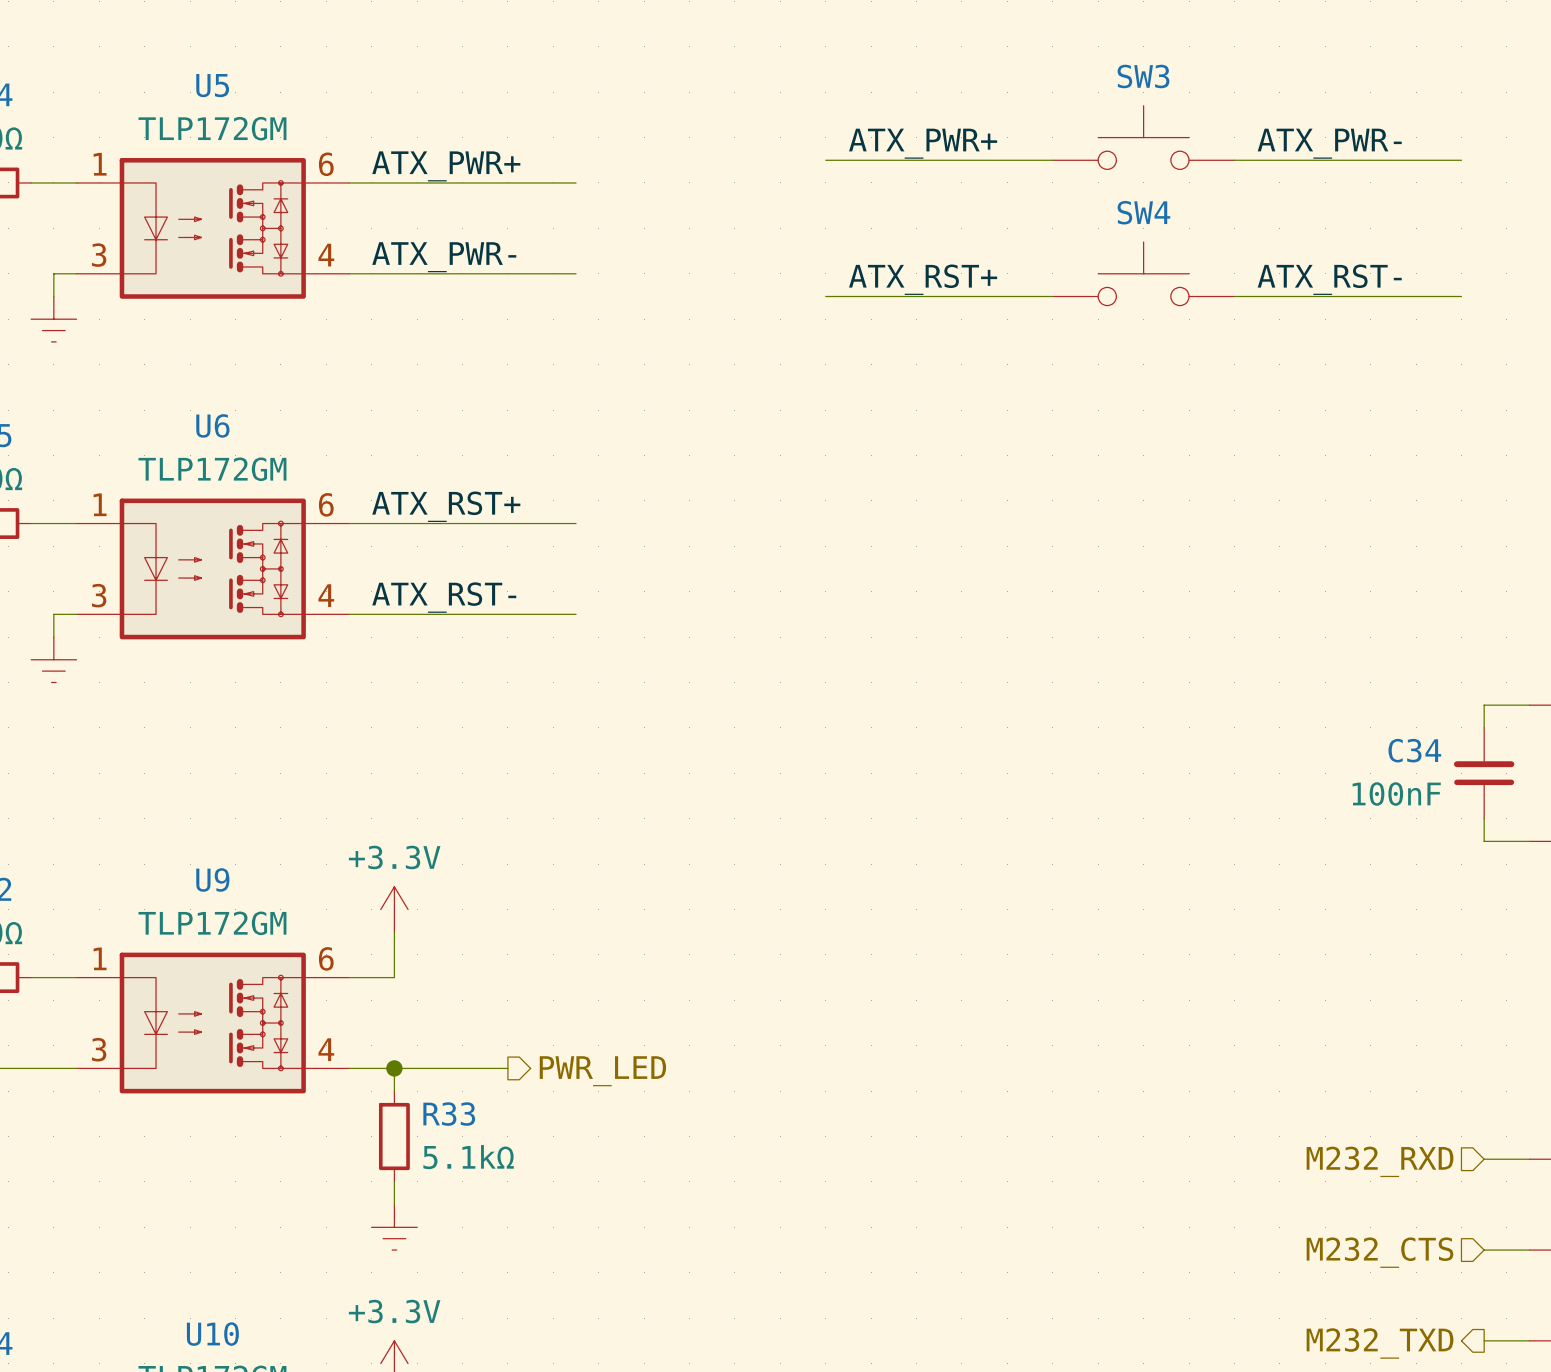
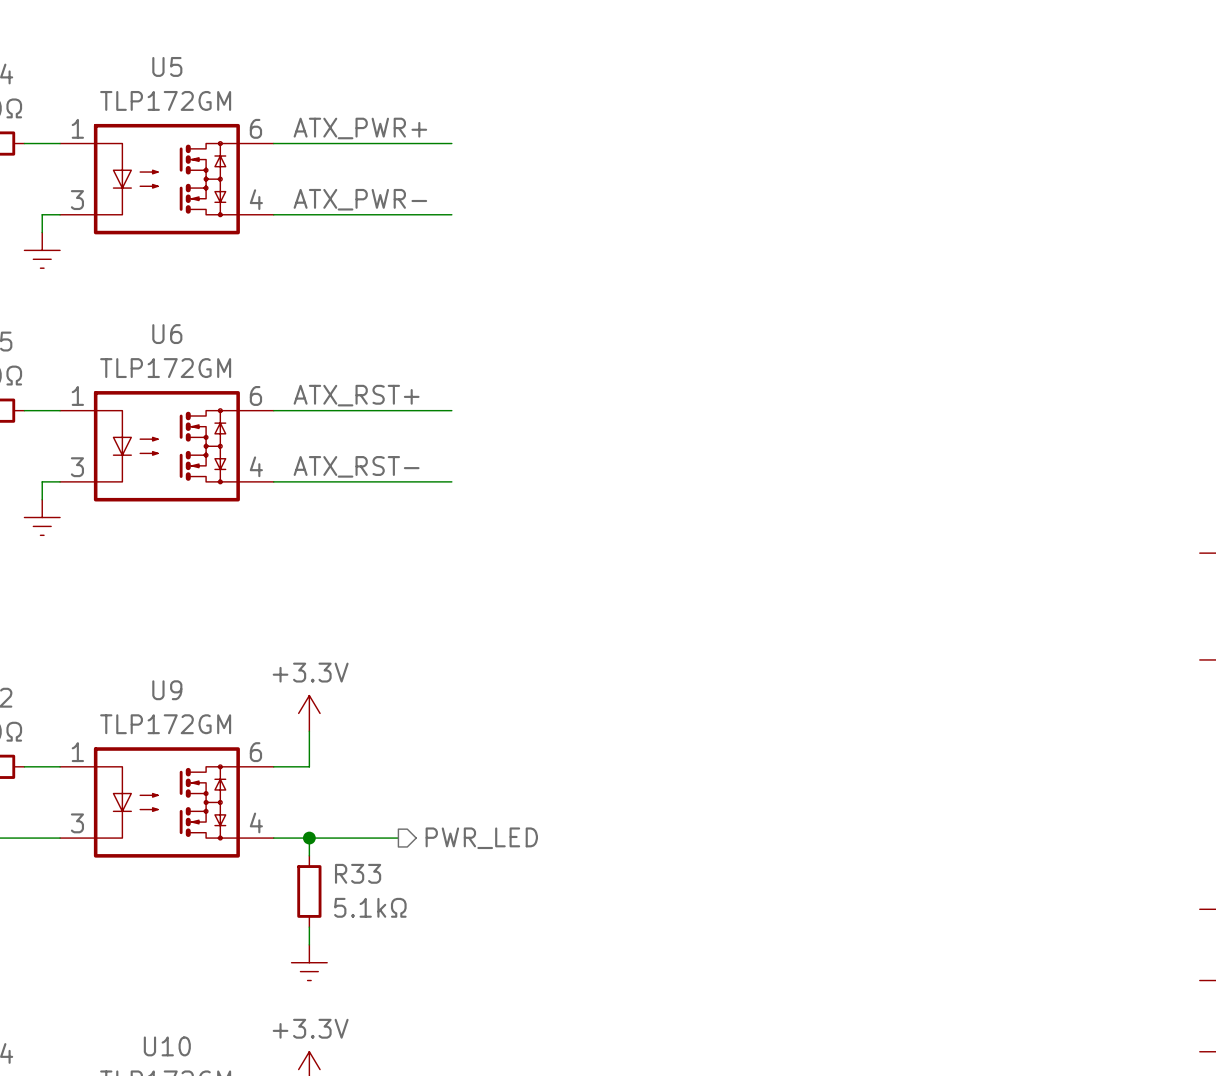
SW3: (1143, 137) -> none
label: ATX_PWR+ (923, 143) -> none
label: ATX_PWR- (1329, 143) -> none
wire: (825, 160) (1052, 160) -> none
wire: (1234, 160) (1461, 160) -> none
SW4: (1143, 273) -> none
label: ATX_RST+ (923, 279) -> none
label: ATX_RST- (1329, 279) -> none
wire: (825, 296) (1052, 296) -> none
wire: (1234, 296) (1461, 296) -> none
wire: (1529, 705) (1484, 705) (1484, 727) -> none
C34: 100nF (1484, 773) -> none
wire: (1484, 818) (1484, 841) (1529, 841) -> none
wire: (1484, 1159) (1529, 1159) -> none
hierarchical label: M232_RXD (1380, 1161) -> none
wire: (1484, 1250) (1529, 1250) -> none
hierarchical label: M232_CTS (1379, 1252) -> none
wire: (1484, 1340) (1529, 1340) -> none
hierarchical label: M232_TXD (1380, 1343) -> none

